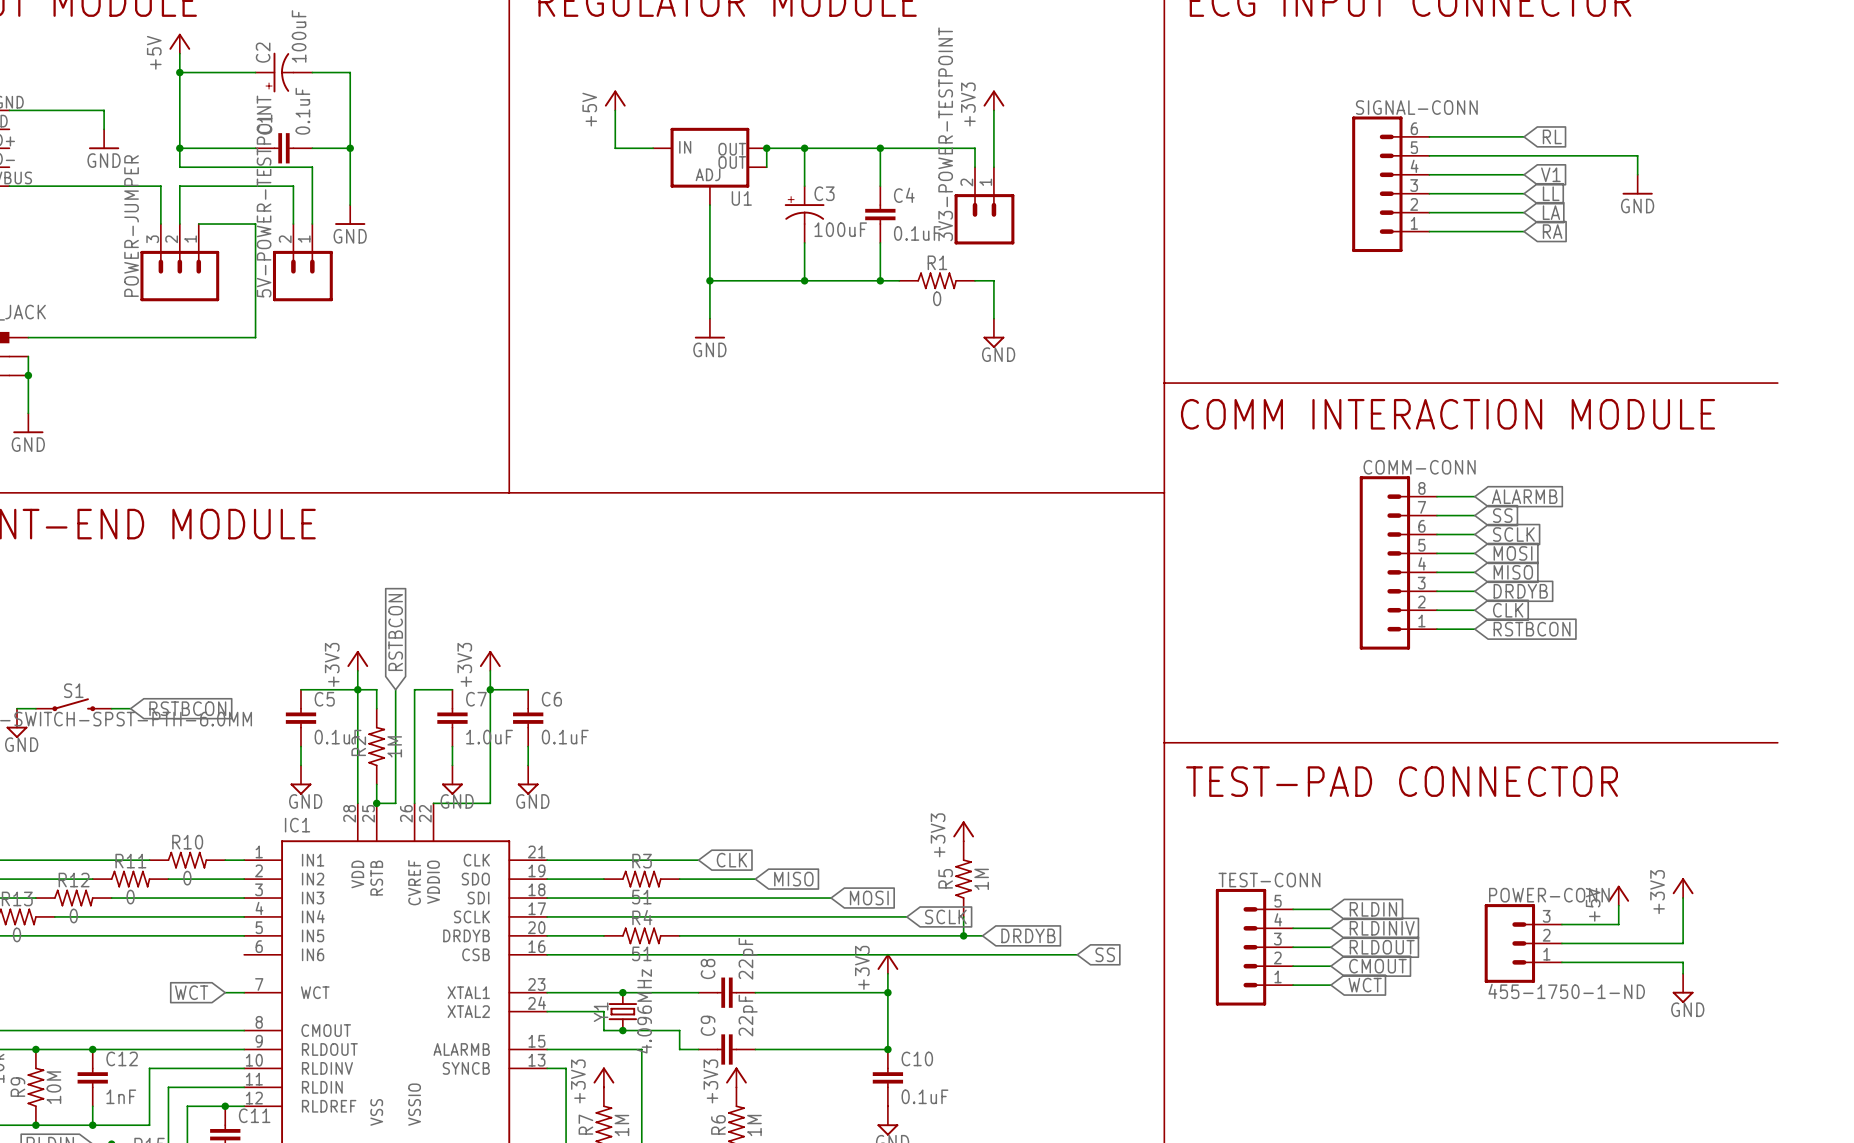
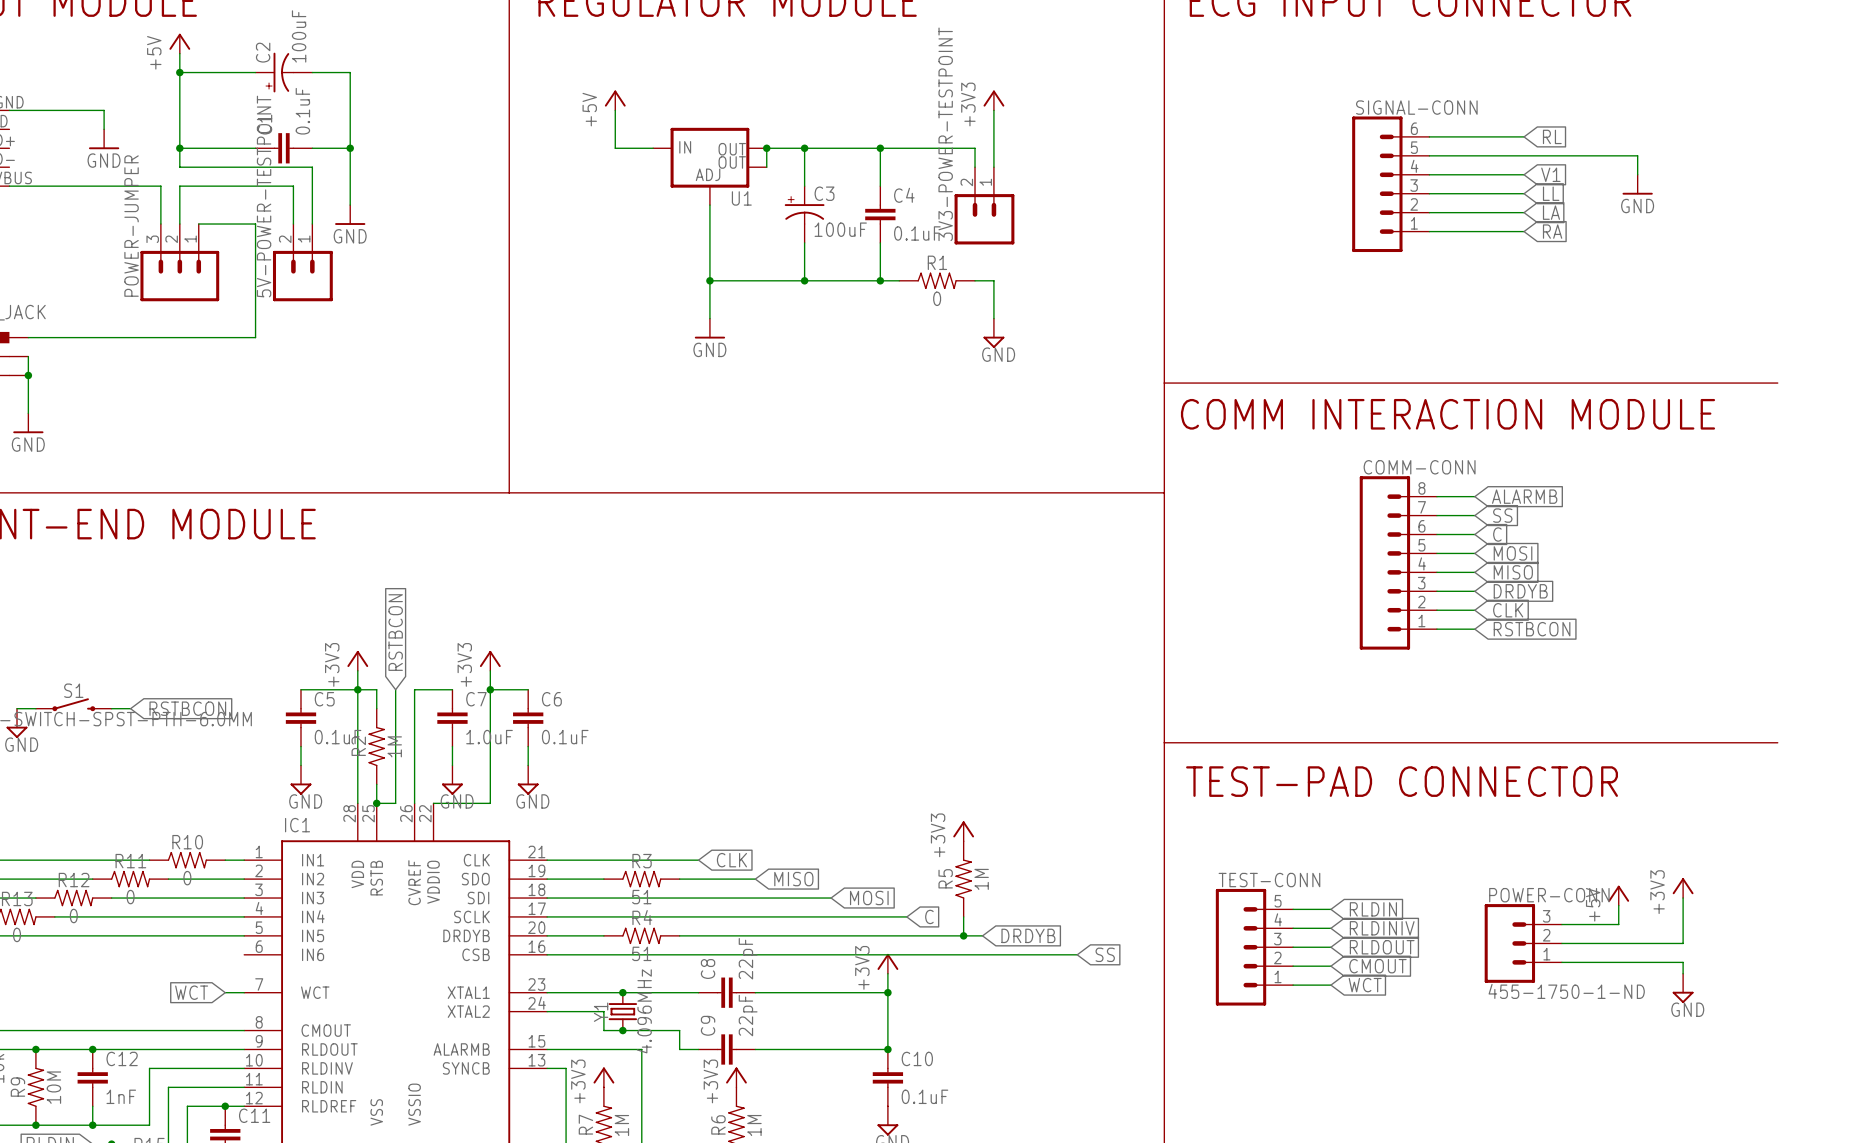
global label: SCLK (1513, 534) -> C (1497, 534)
global label: SCLK (945, 916) -> C (929, 916)

